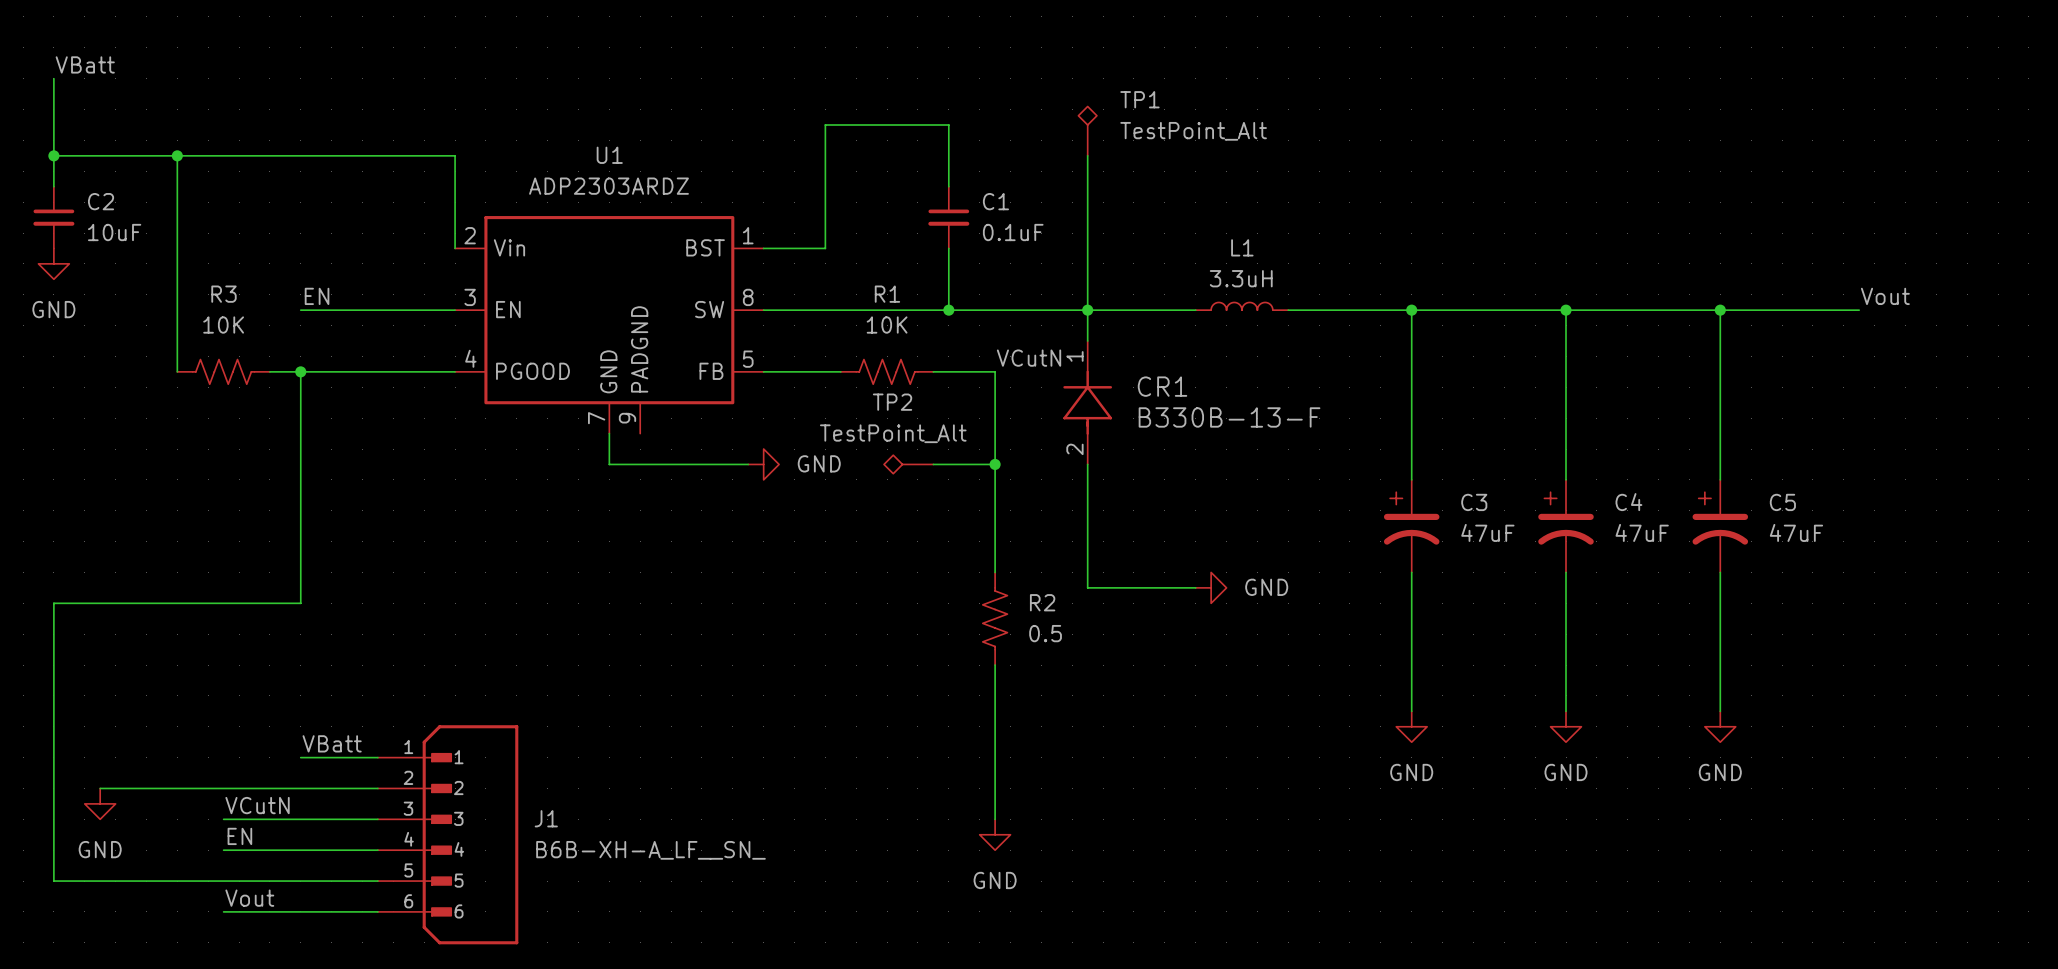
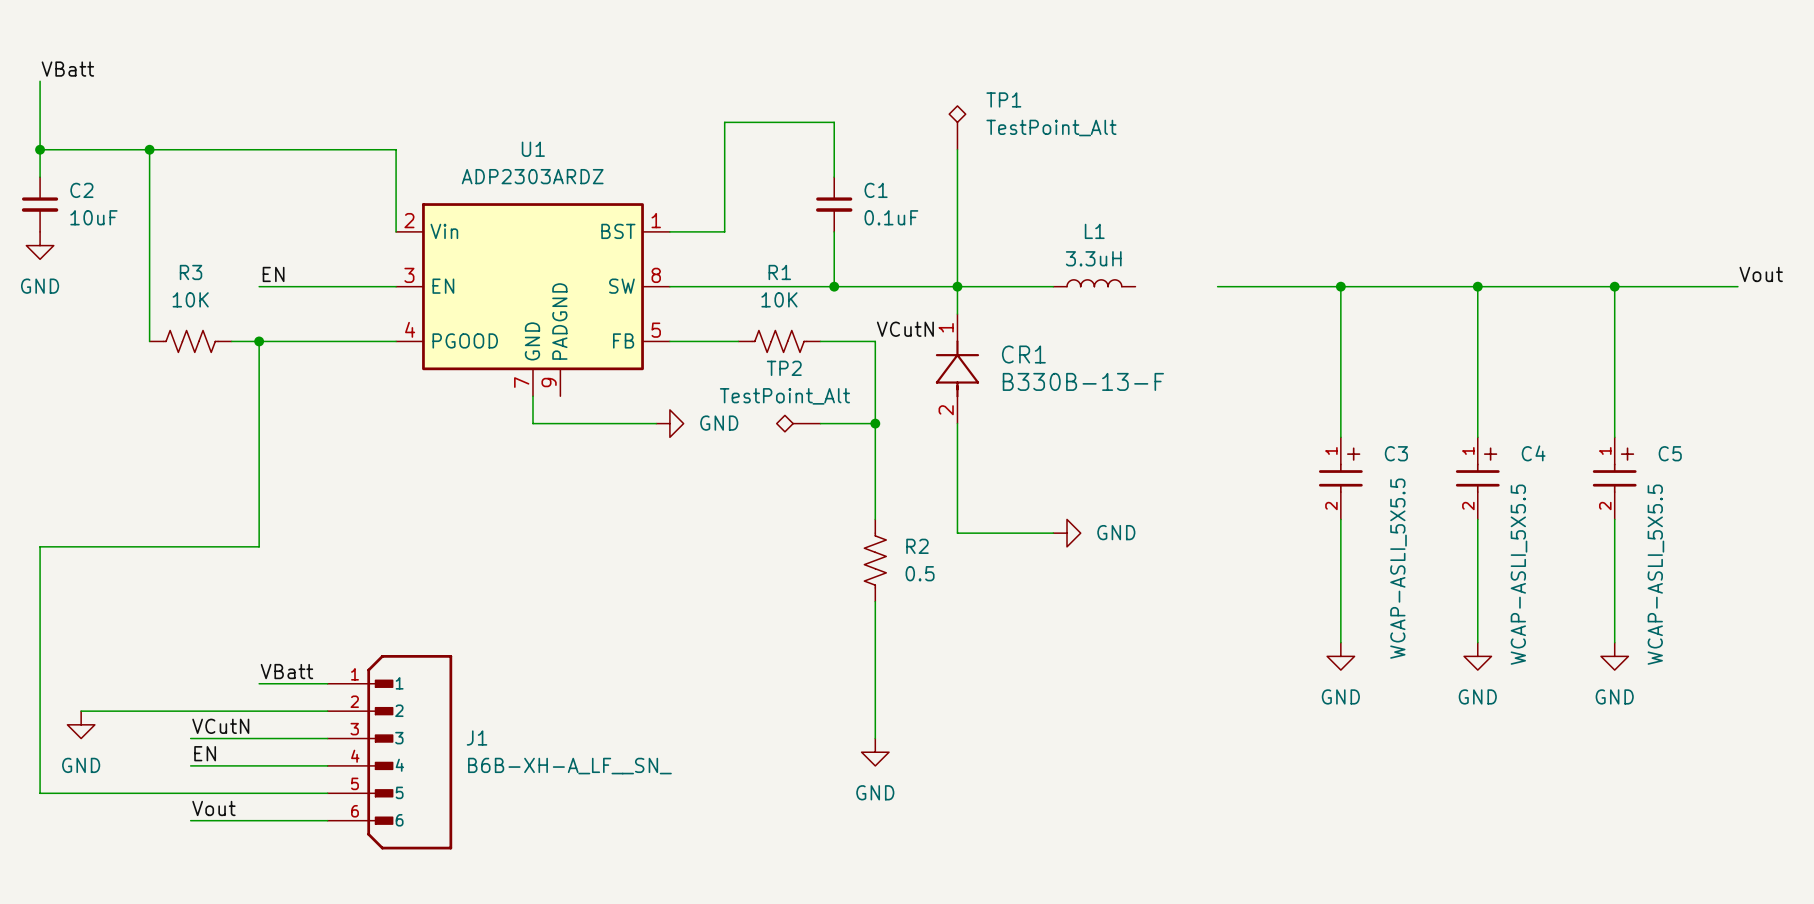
label position: Vout (1885, 296) -> Vout (1761, 274)
wire: (1288, 310) (1380, 310) -> none
wire: (1411, 310) (1411, 479) -> (1340, 286) (1340, 437)
junction: (1411, 310) -> none
wire: (1566, 310) (1566, 479) -> (1477, 286) (1477, 437)
junction position: (1566, 310) -> (1340, 286)
wire: (1720, 310) (1720, 479) -> (1614, 286) (1614, 437)
junction position: (1720, 310) -> (1477, 286)
junction: none -> (1614, 286)
wire: none -> (1642, 286) (1737, 286)
C3 symbol: [1383, 479, 1440, 573] -> [1318, 437, 1363, 520]
C4 symbol: [1538, 479, 1594, 573] -> [1455, 437, 1500, 520]
C5 symbol: [1692, 479, 1749, 573] -> [1592, 437, 1637, 520]
C3 value: 47uF (1487, 532) -> WCAP-ASLI_5X5.5 (1398, 568)
C4 value: 47uF (1642, 532) -> WCAP-ASLI_5X5.5 (1518, 574)
C5 value: 47uF (1796, 532) -> WCAP-ASLI_5X5.5 (1655, 574)
wire: (1411, 572) (1411, 711) -> (1340, 519) (1340, 642)
wire: (1566, 572) (1566, 711) -> (1477, 519) (1477, 642)
wire: (1720, 572) (1720, 711) -> (1614, 519) (1614, 642)
power symbol: GND (1411, 726) -> none
power symbol position: GND (1566, 726) -> GND (1340, 656)
power symbol position: GND (1720, 726) -> GND (1477, 656)
power symbol: none -> GND (1614, 656)

